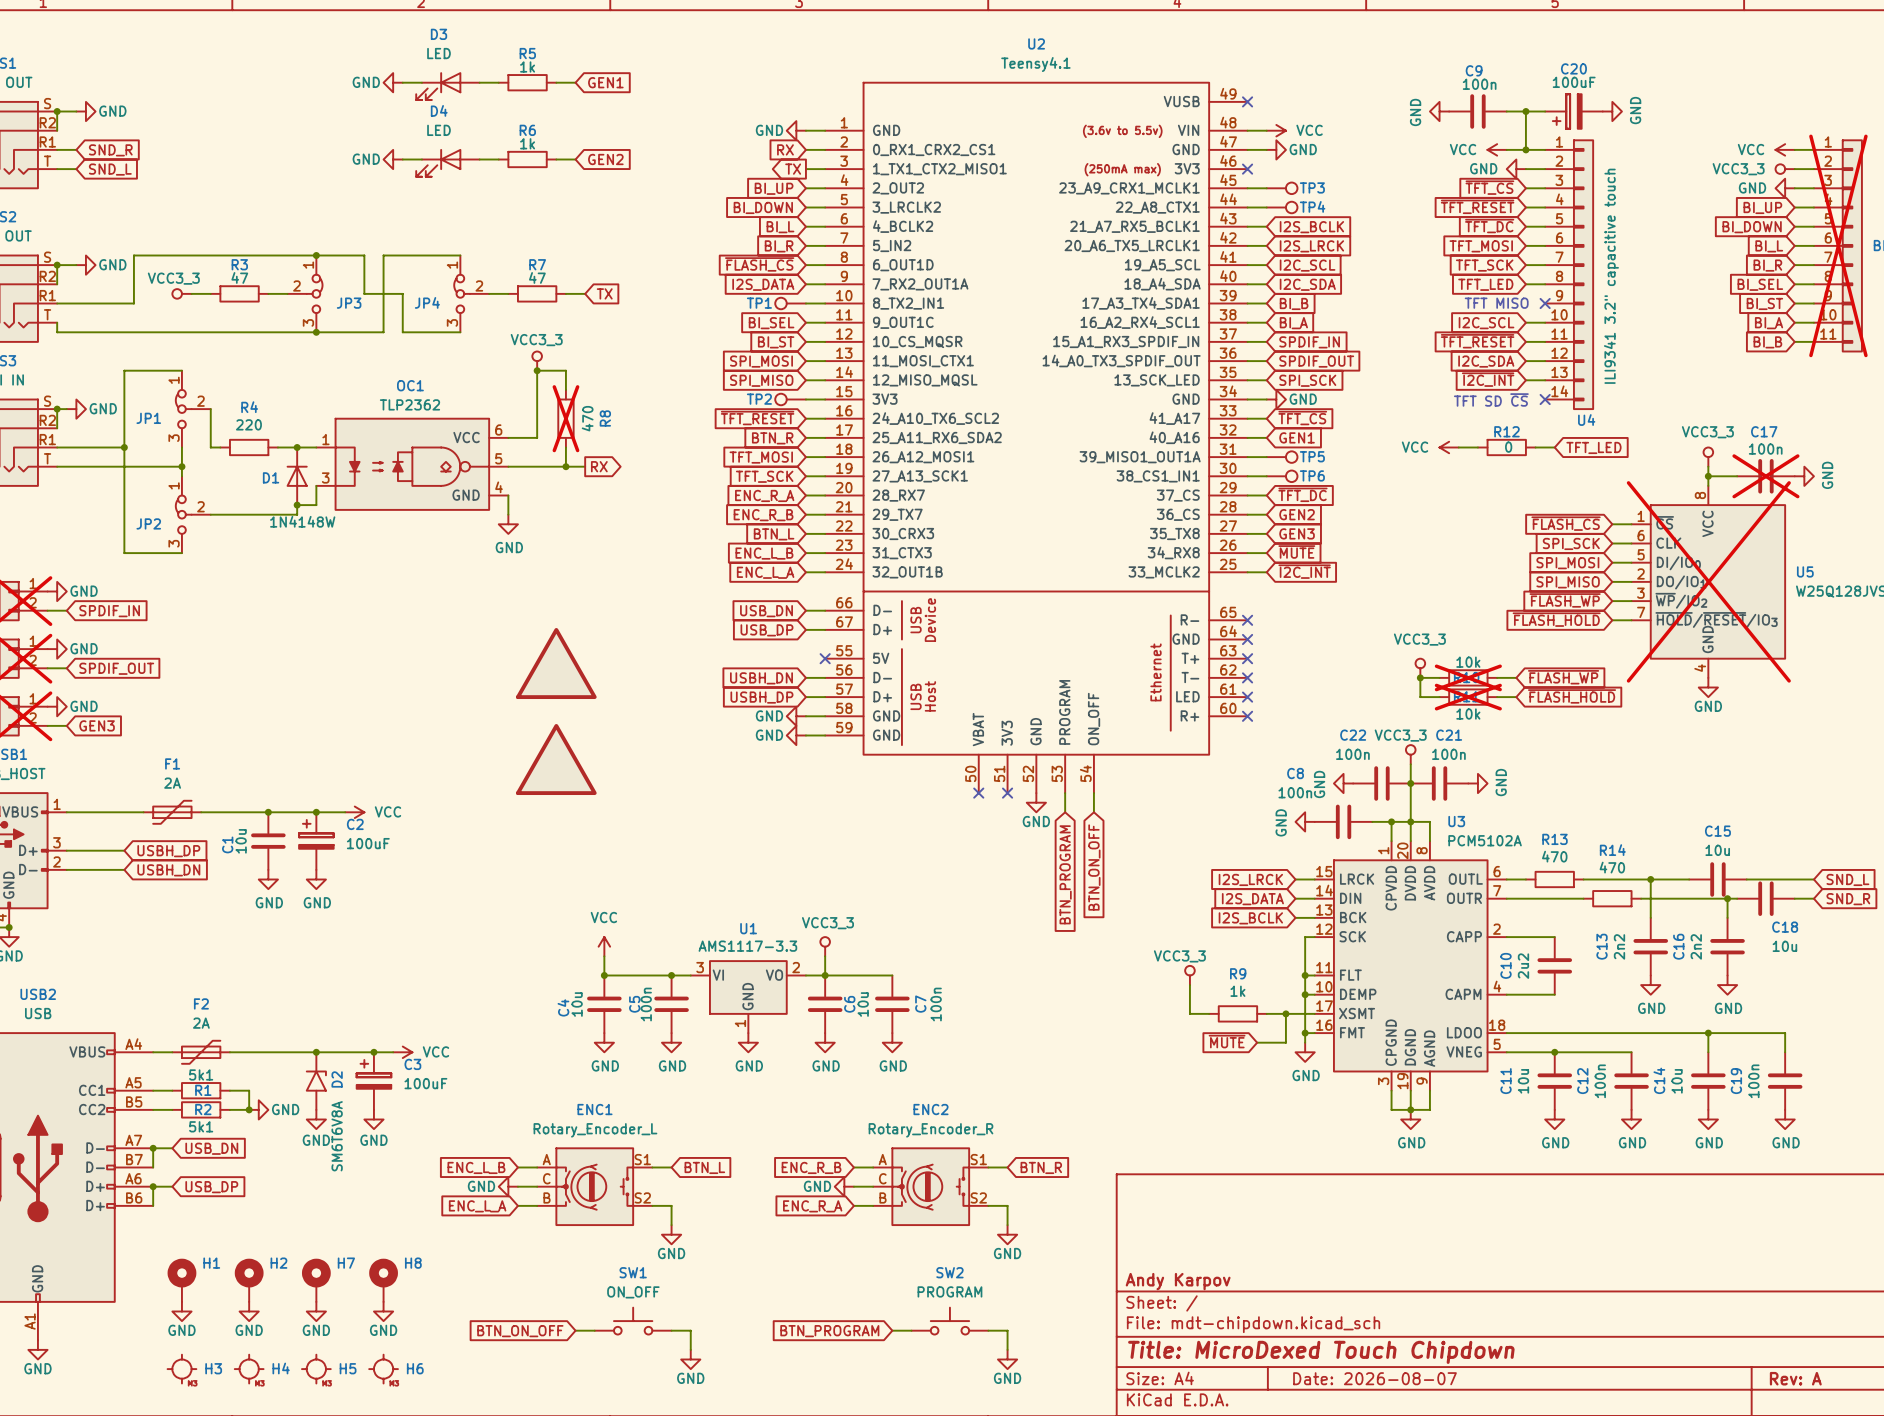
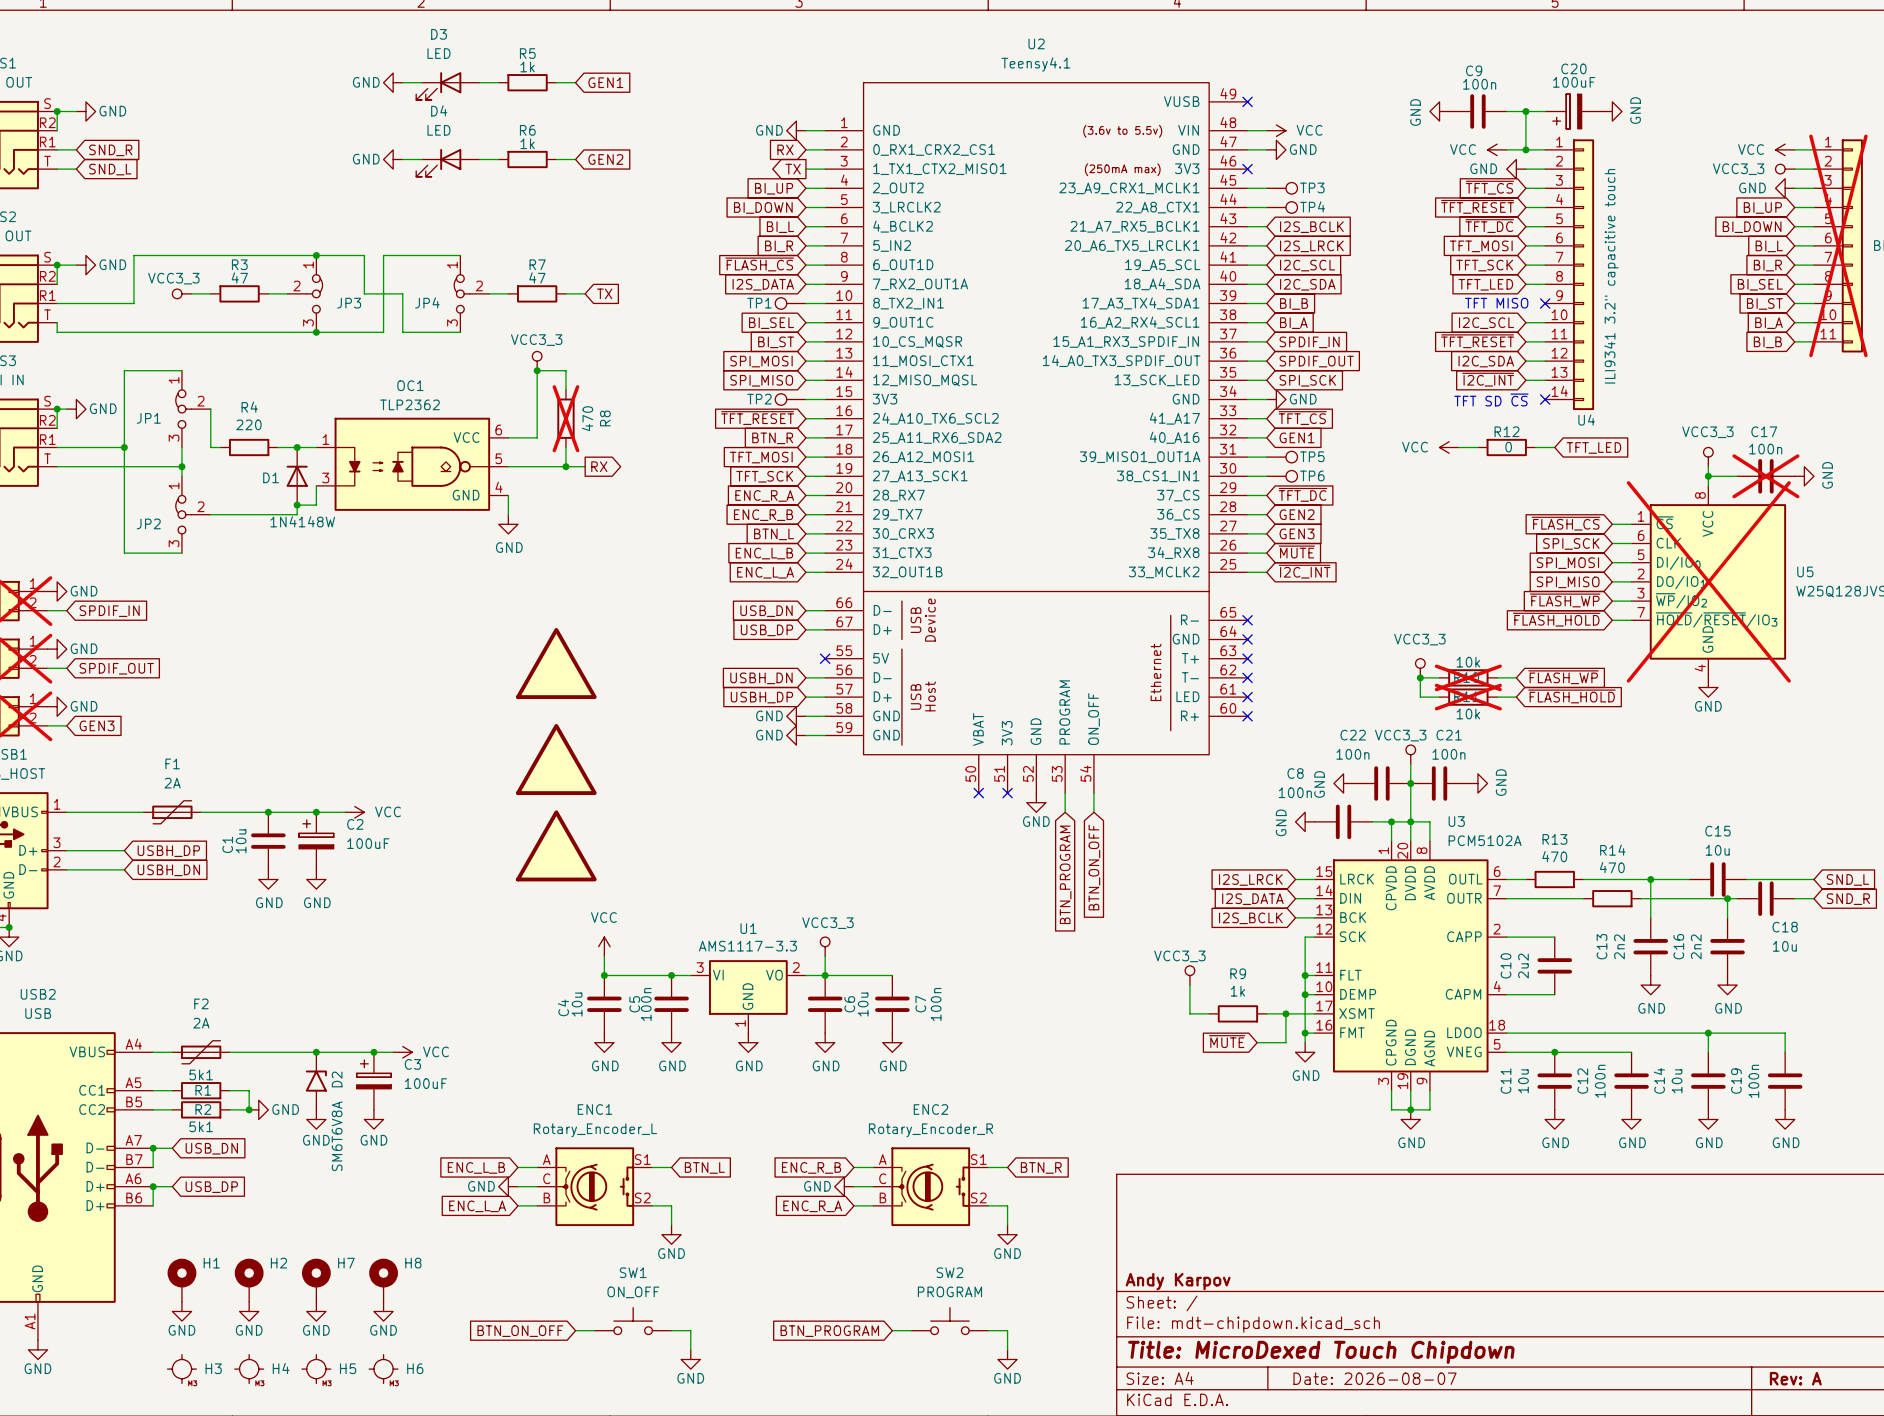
part: none -> (556, 845)

